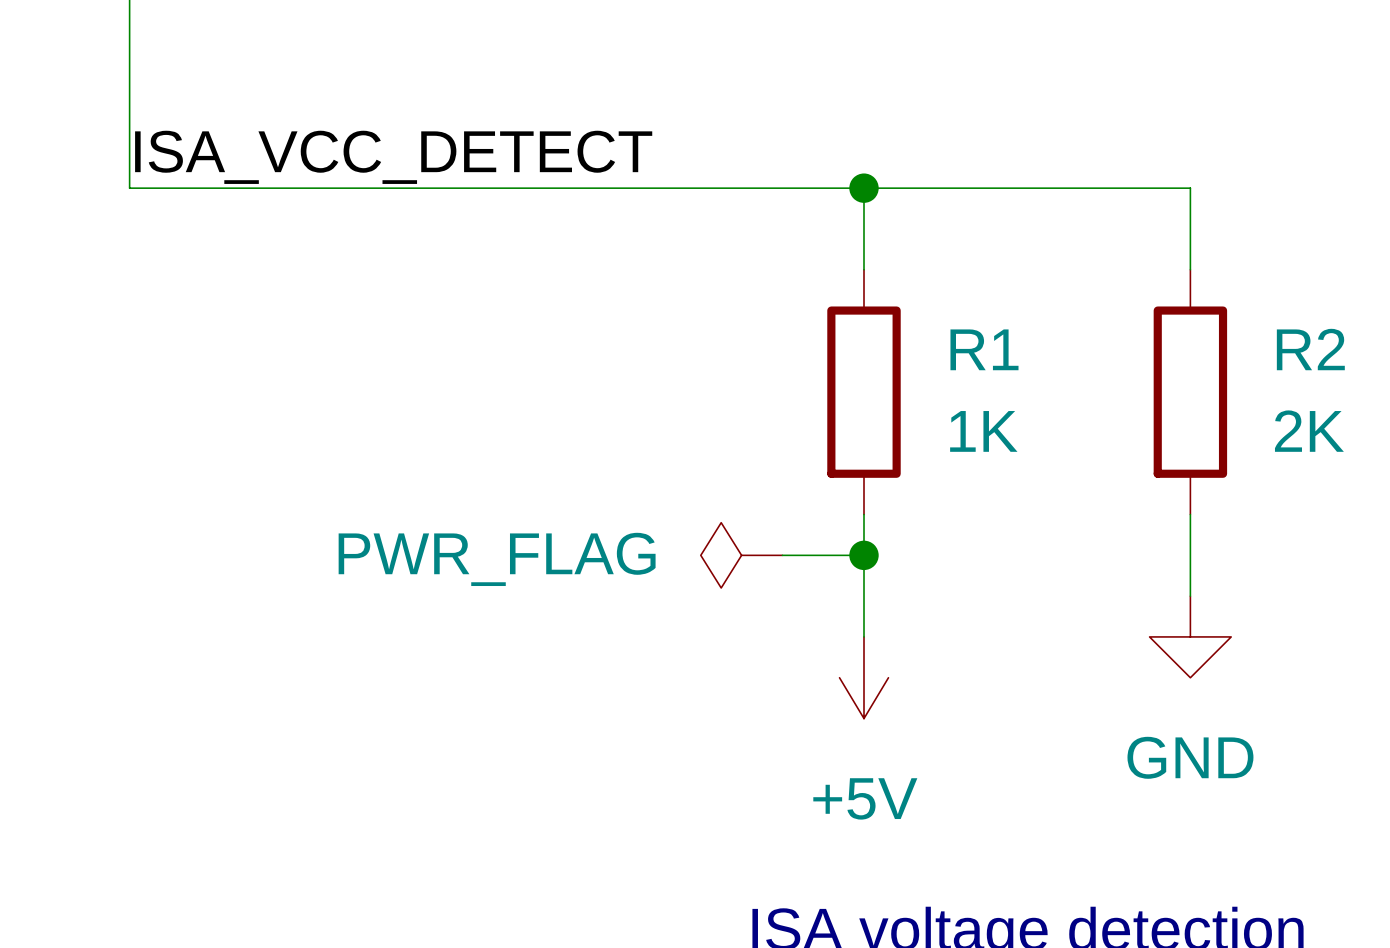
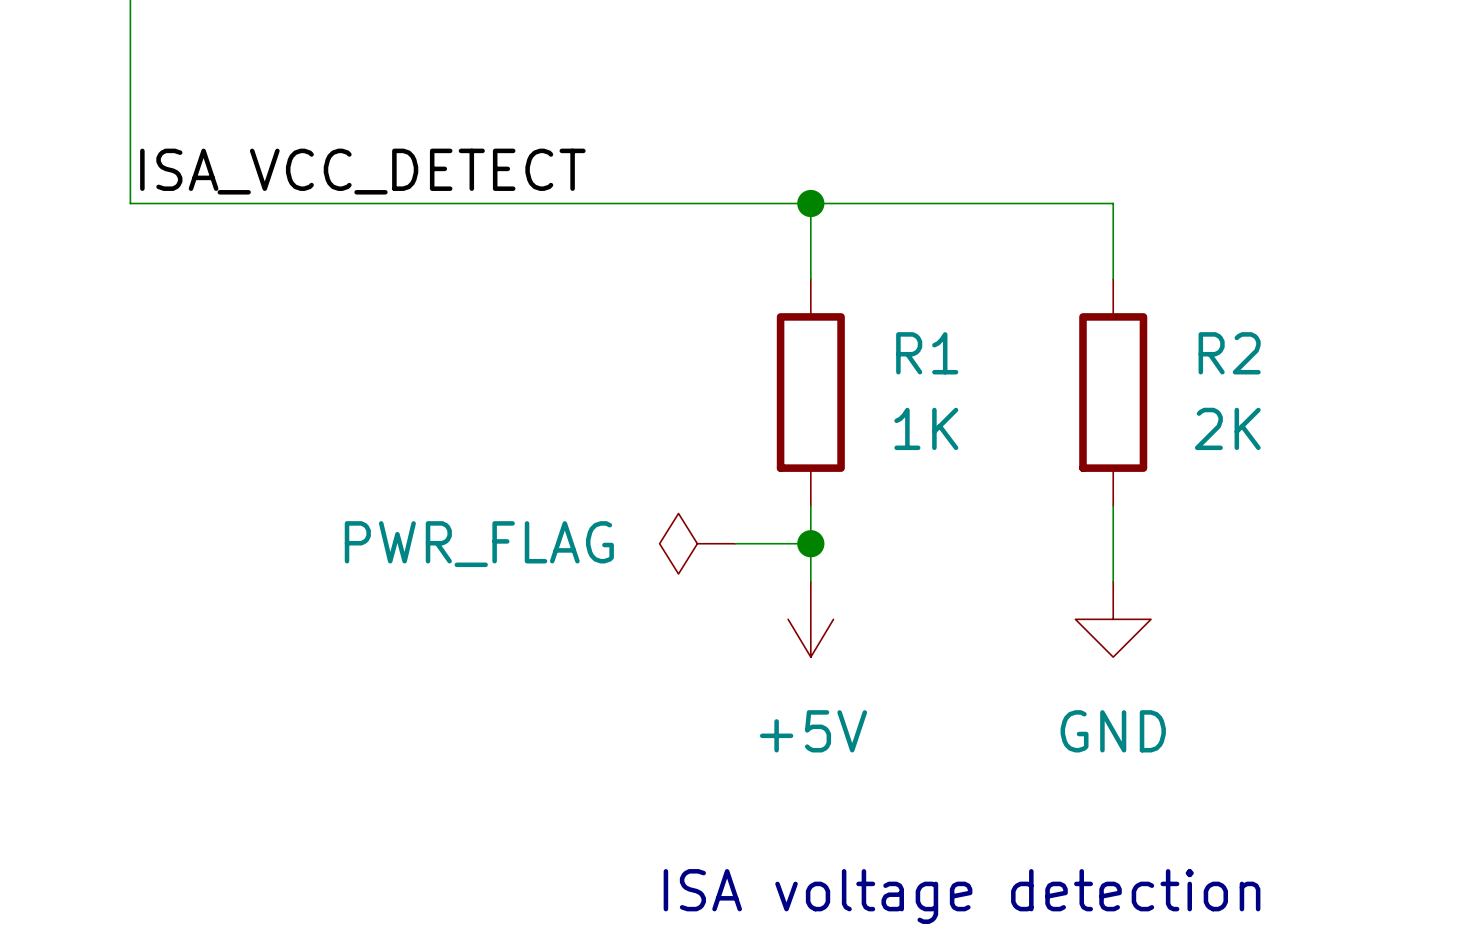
power symbol position: +5V (864, 677) -> +5V (810, 619)

